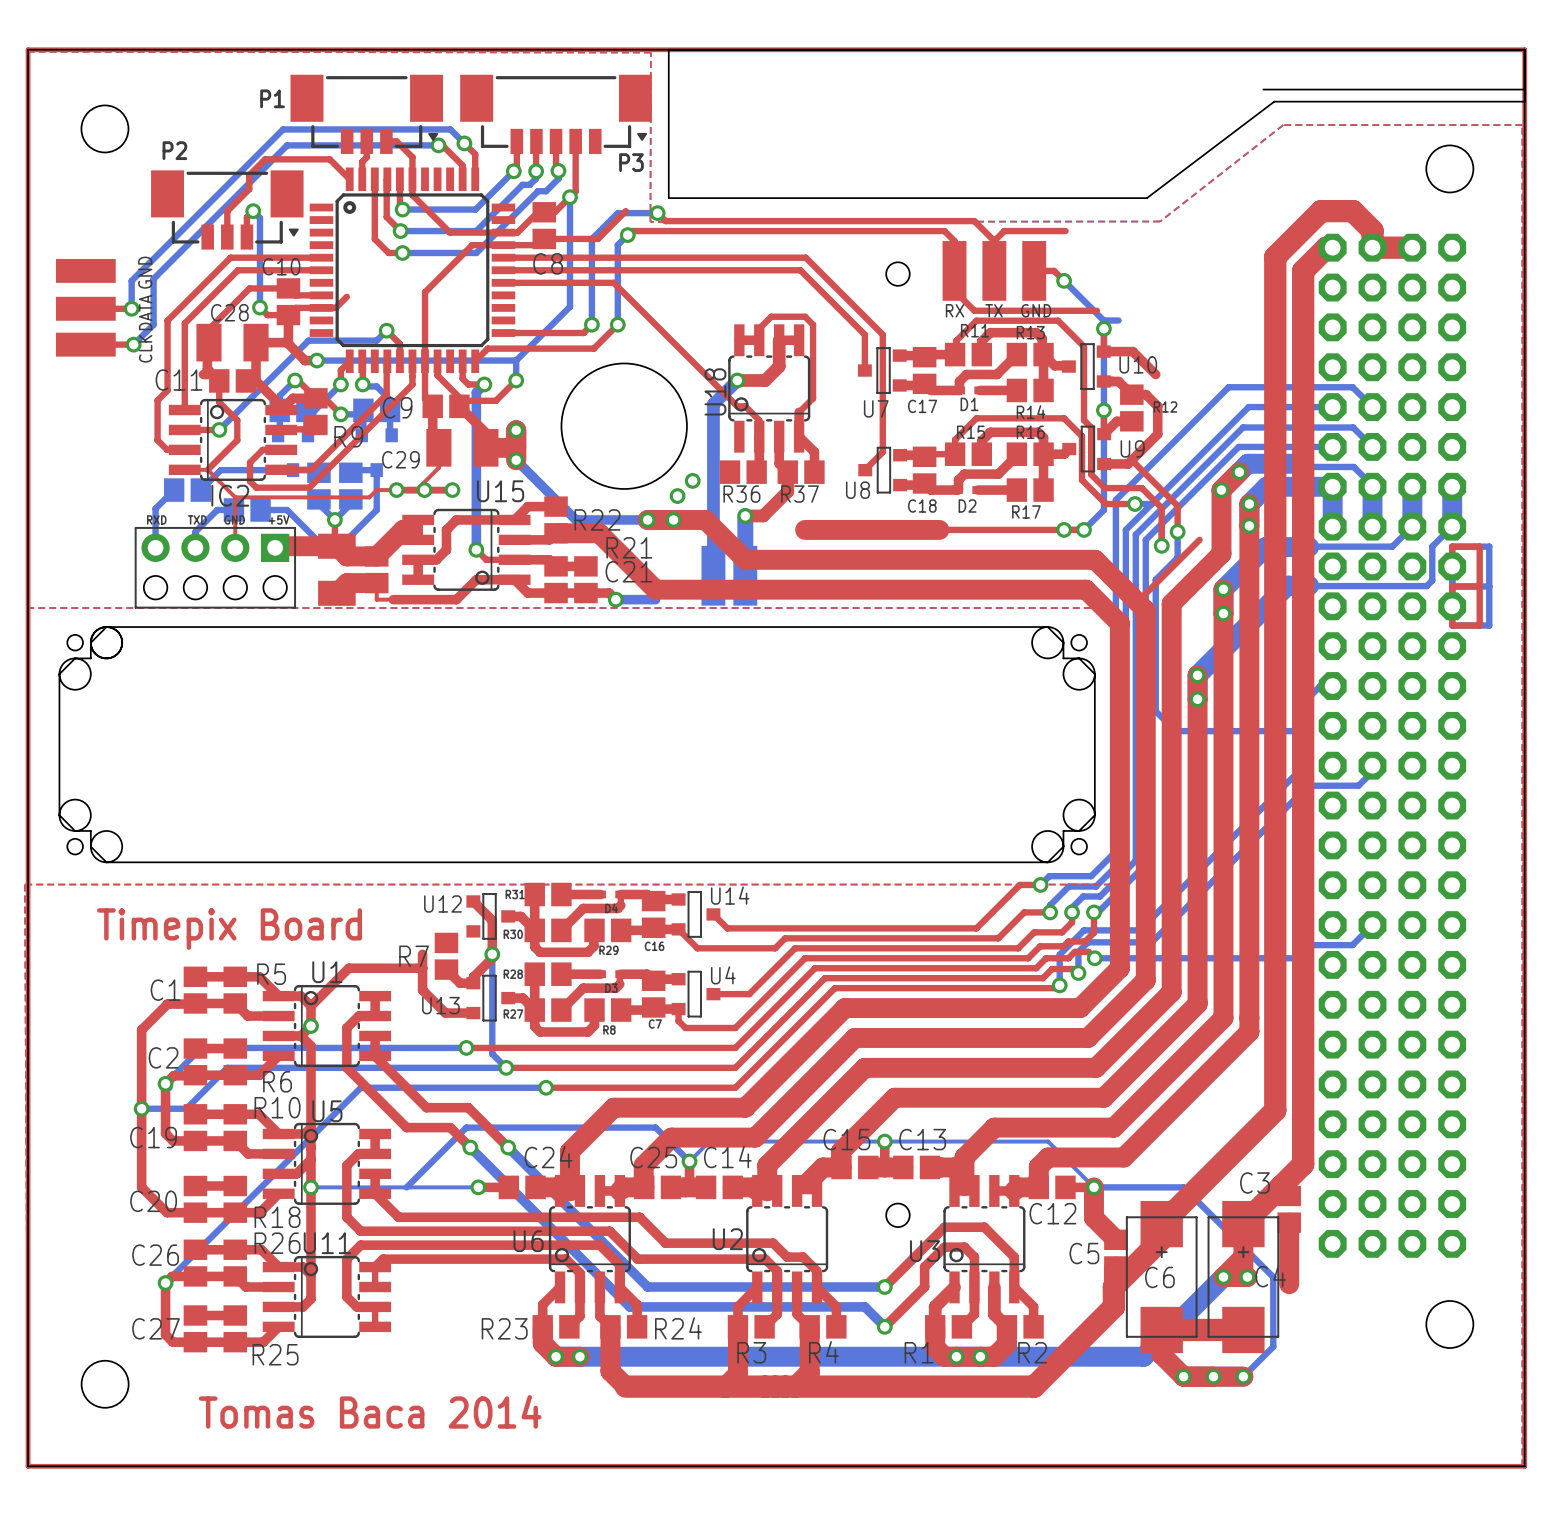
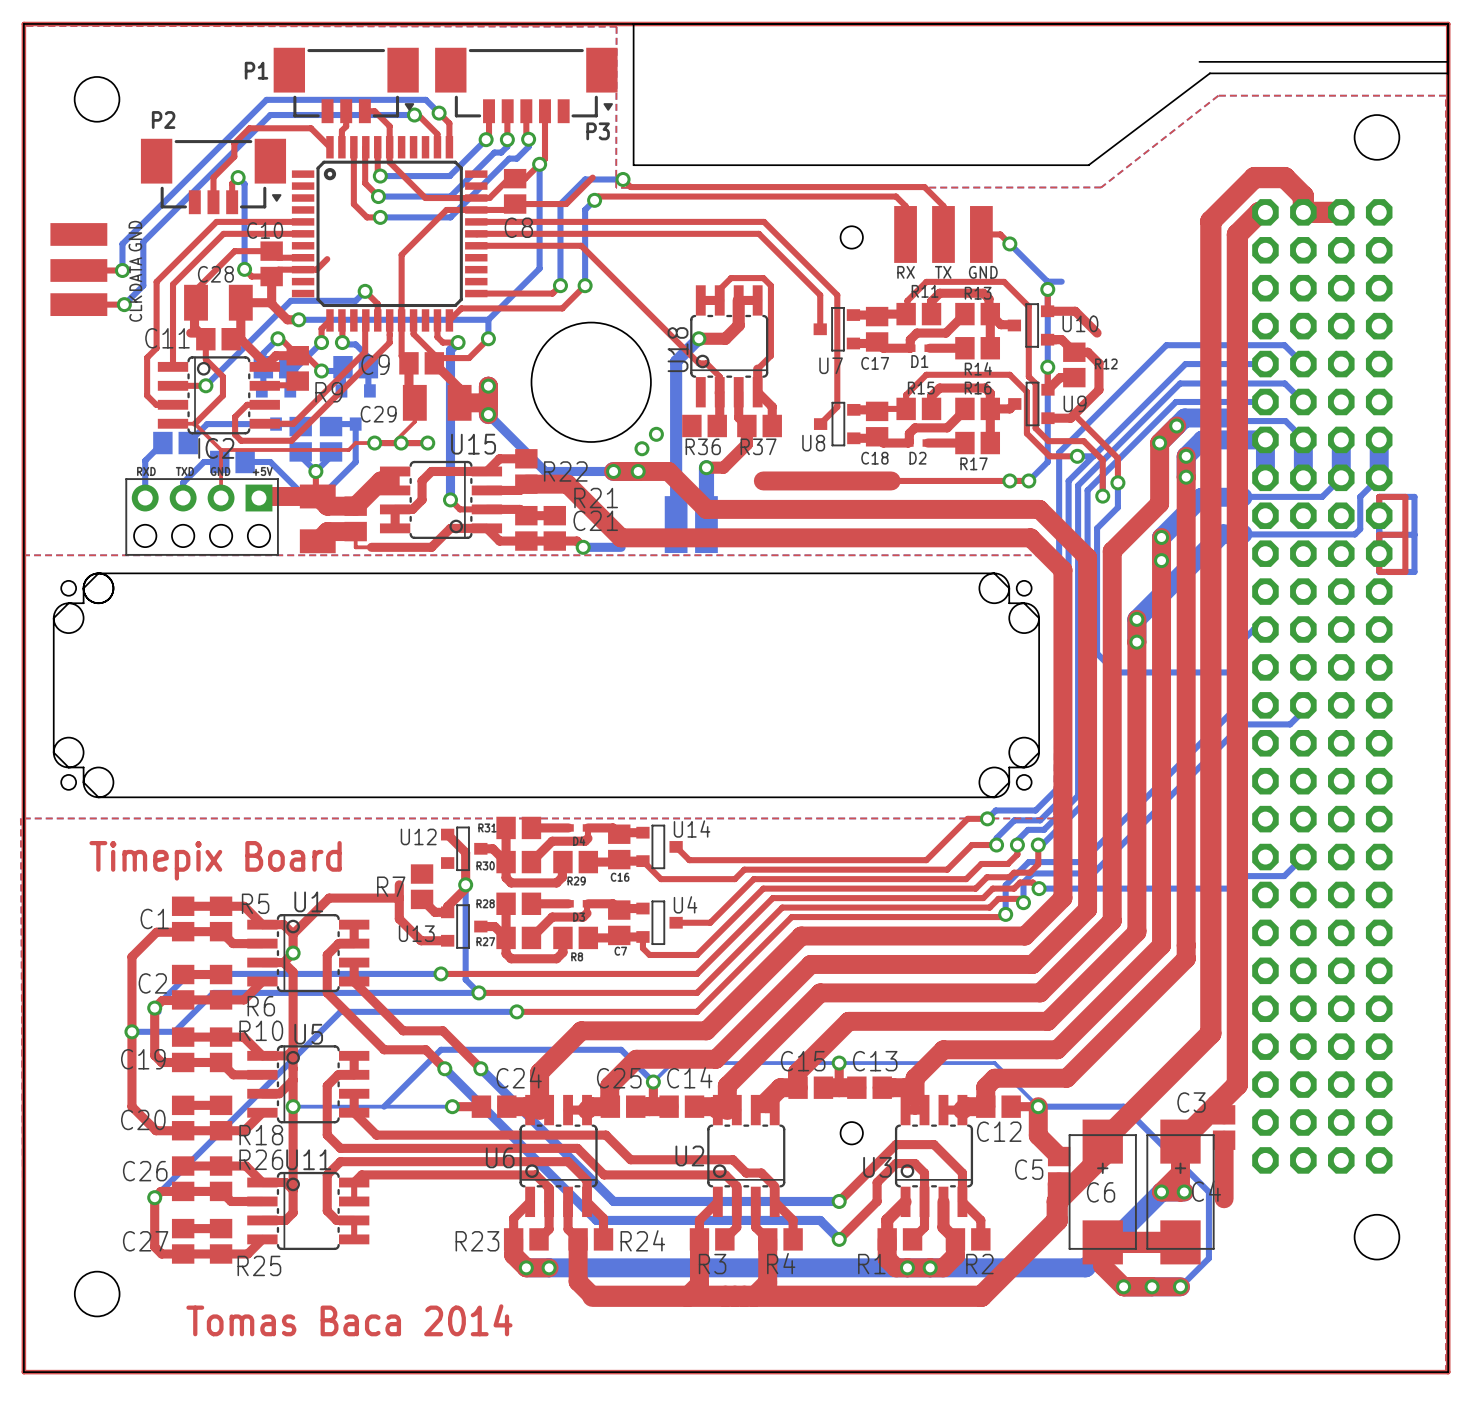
top track: (1065, 231) (1004, 231) (994, 241) -> none
top track: (954, 290) (974, 310) (1096, 310) -> none
top track: (1199, 539) (1137, 602) -> none

